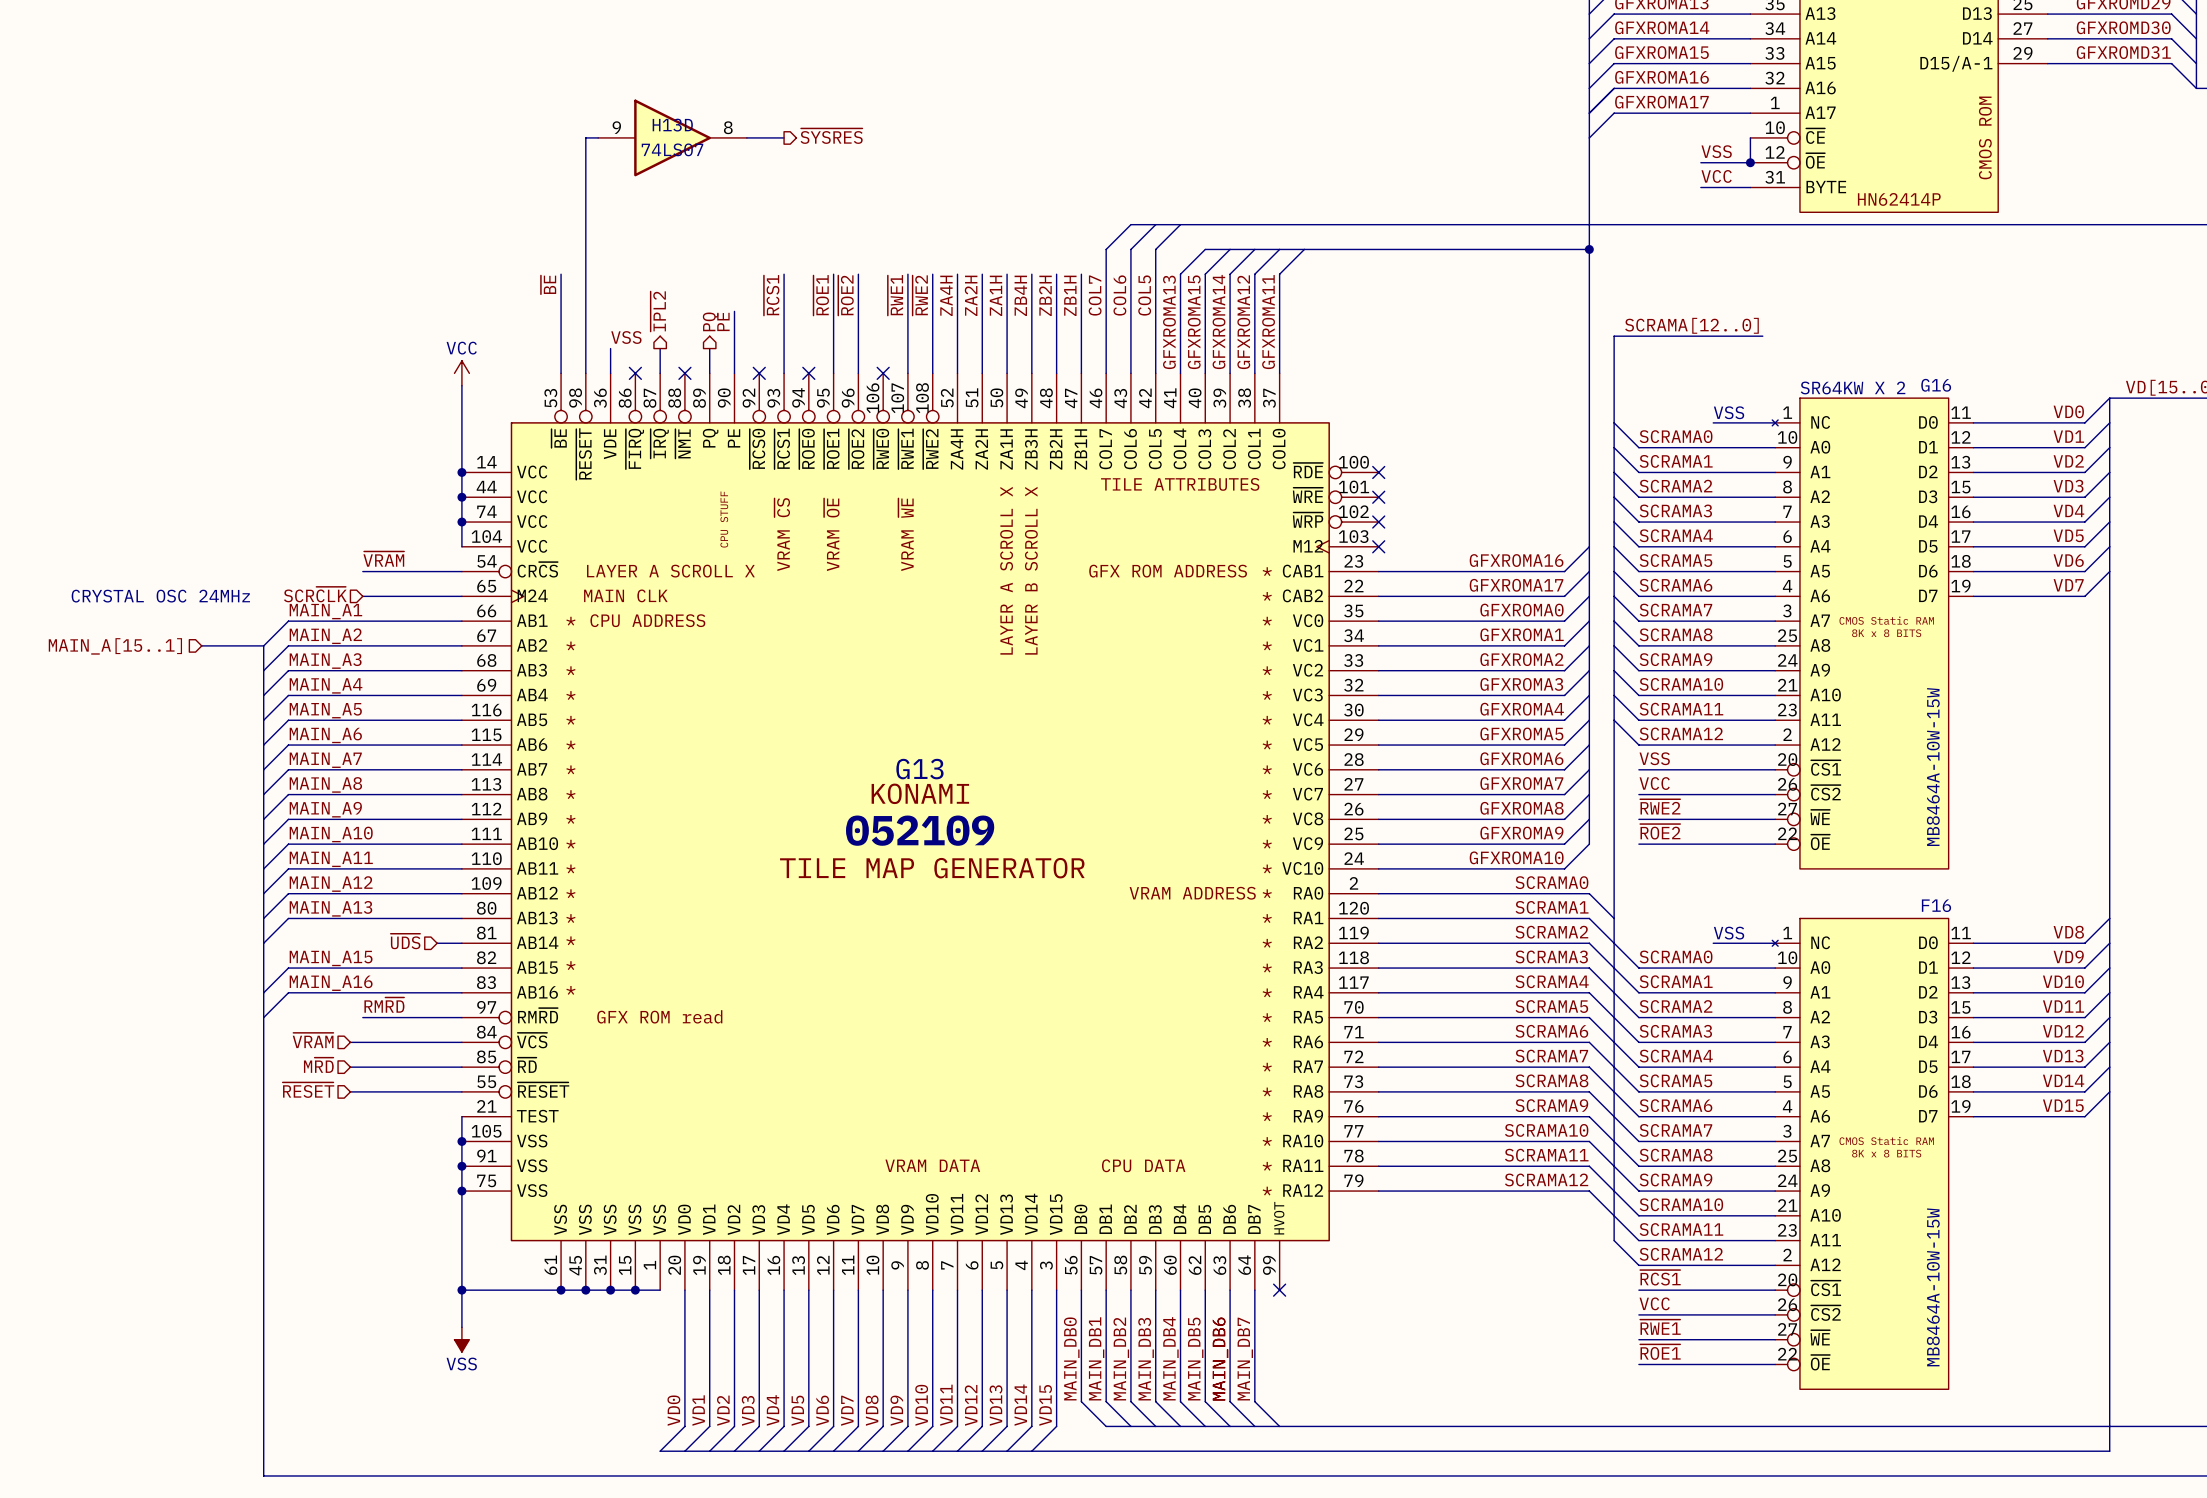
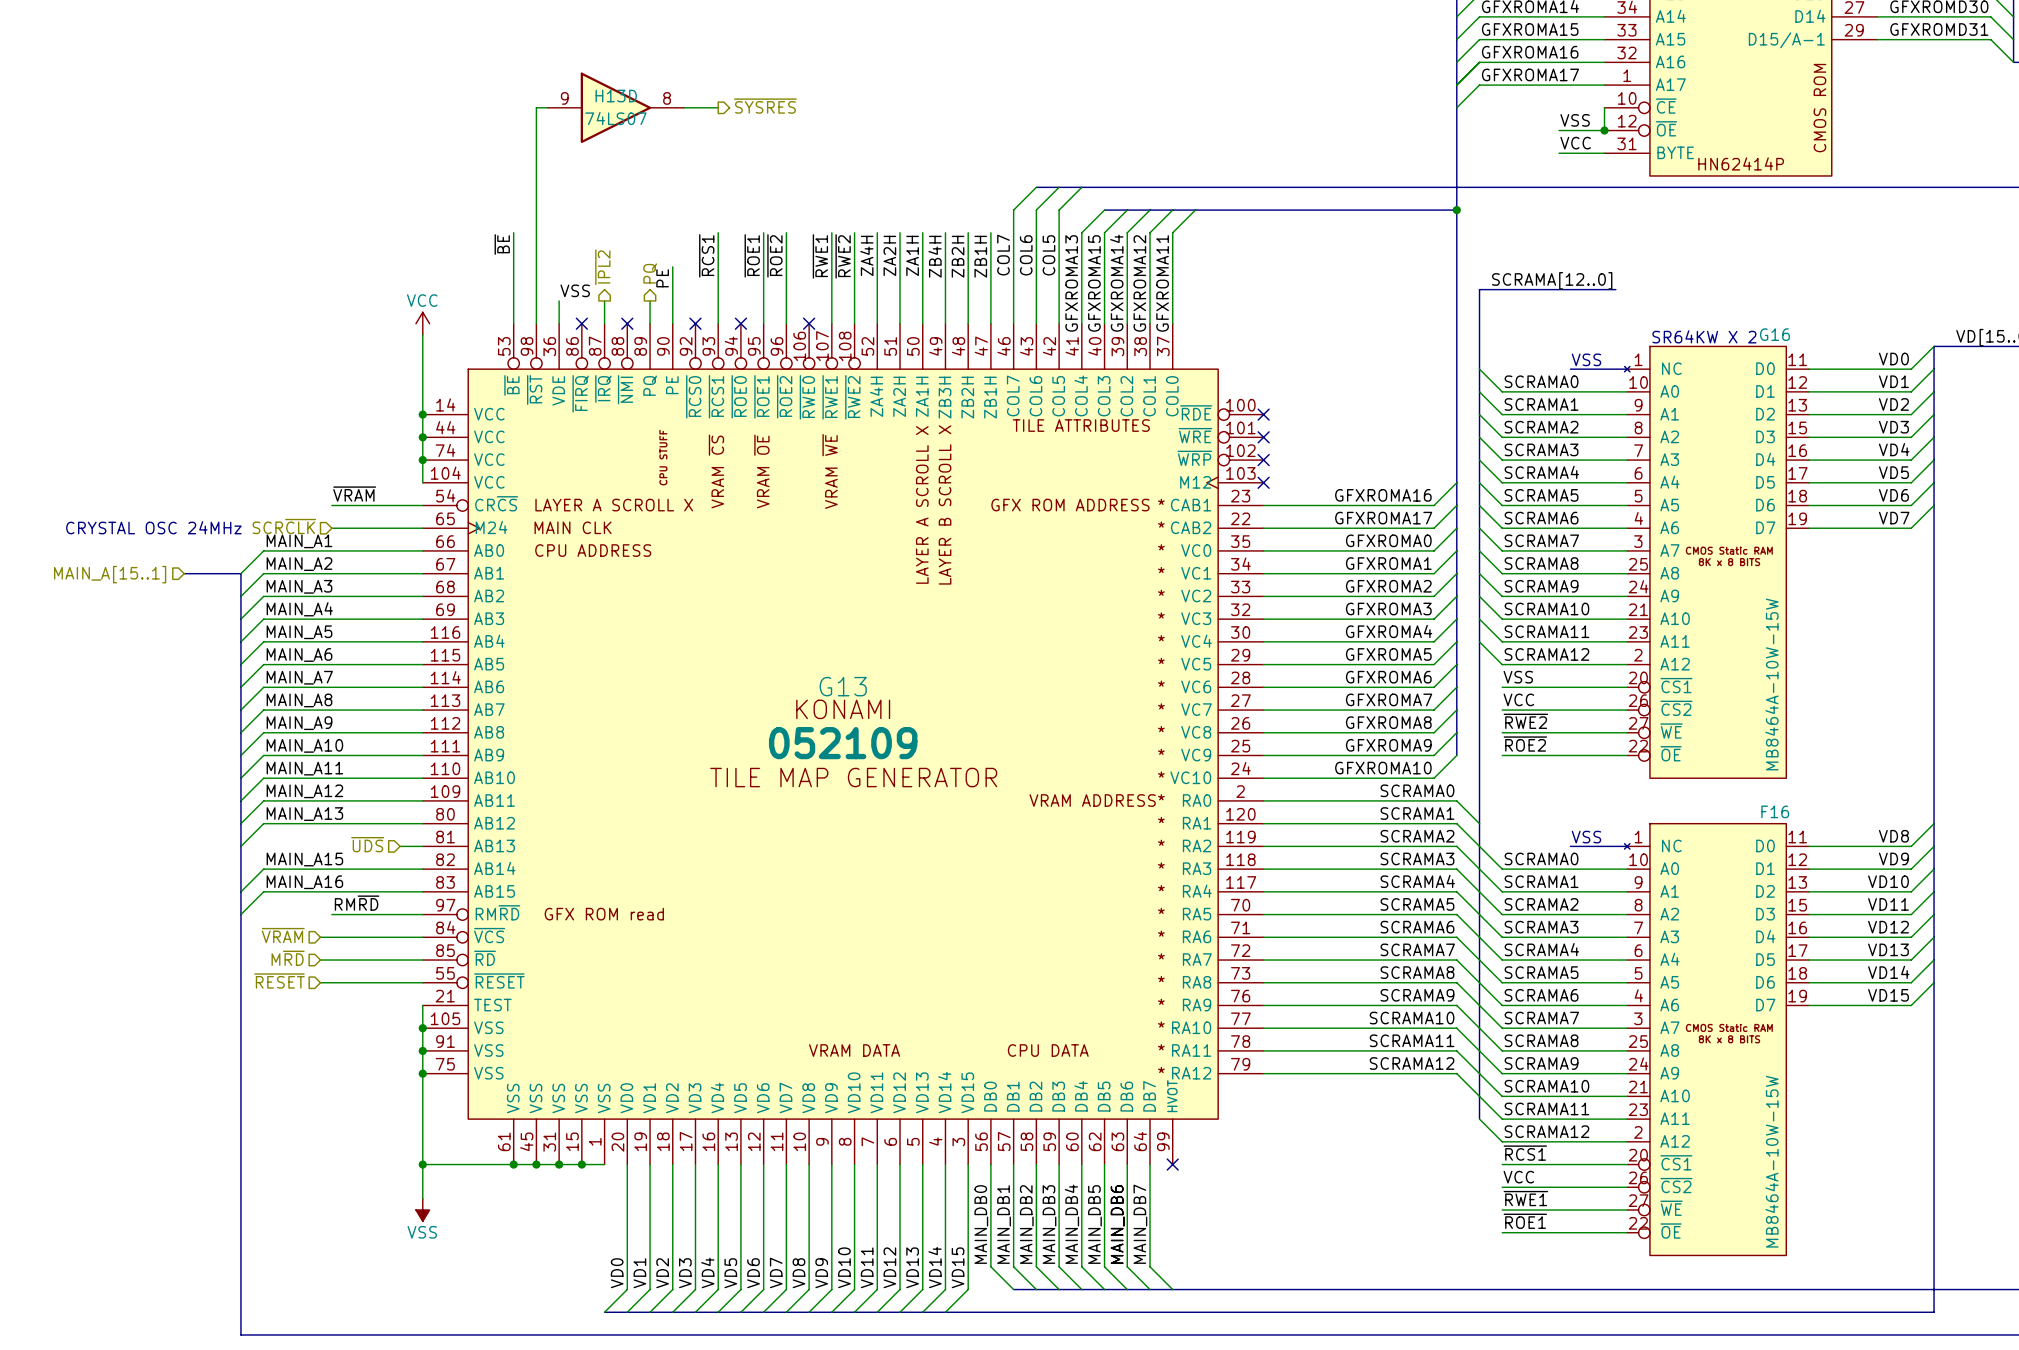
G13 symbol: [461, 373, 1379, 1291] -> [422, 323, 1264, 1165]

